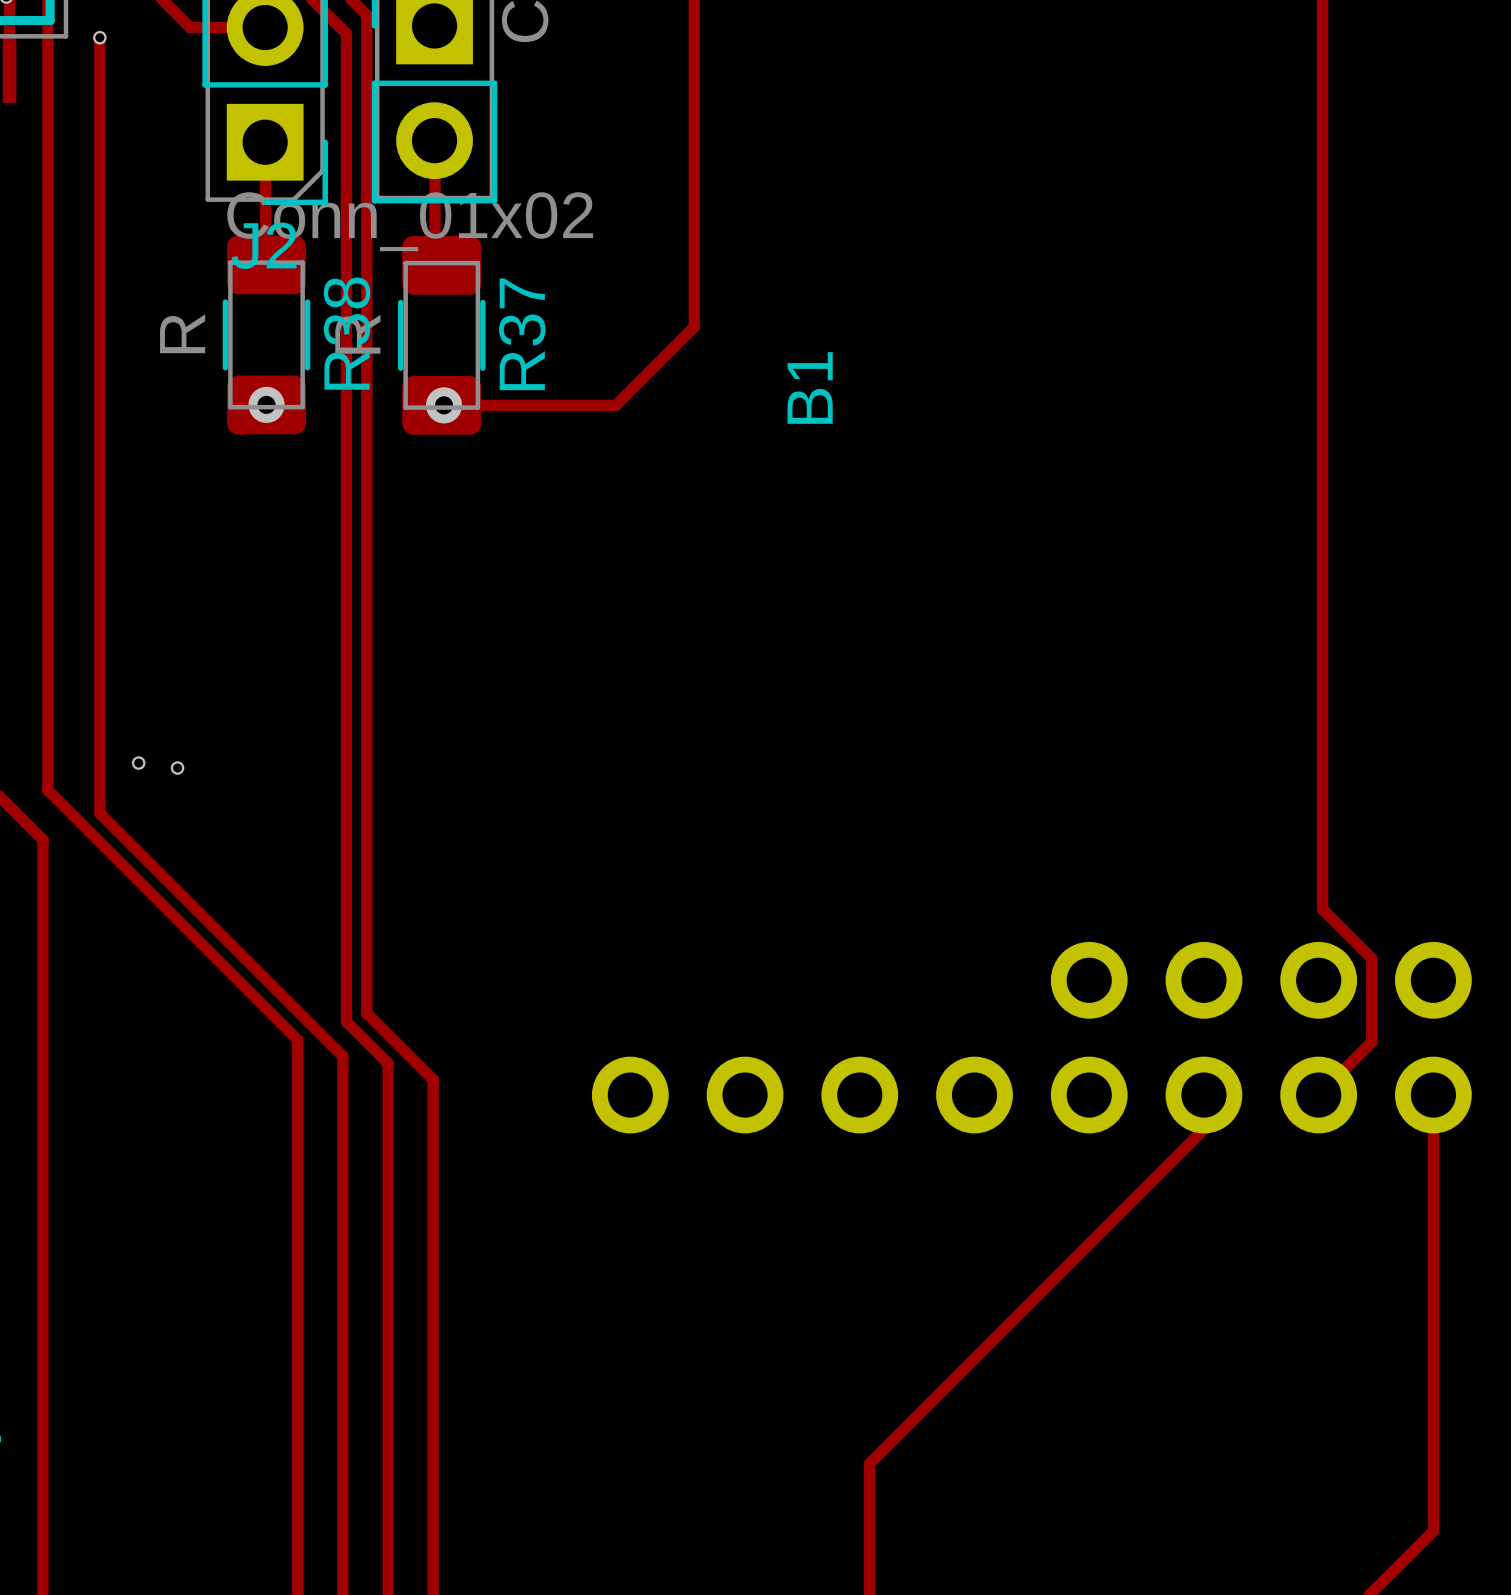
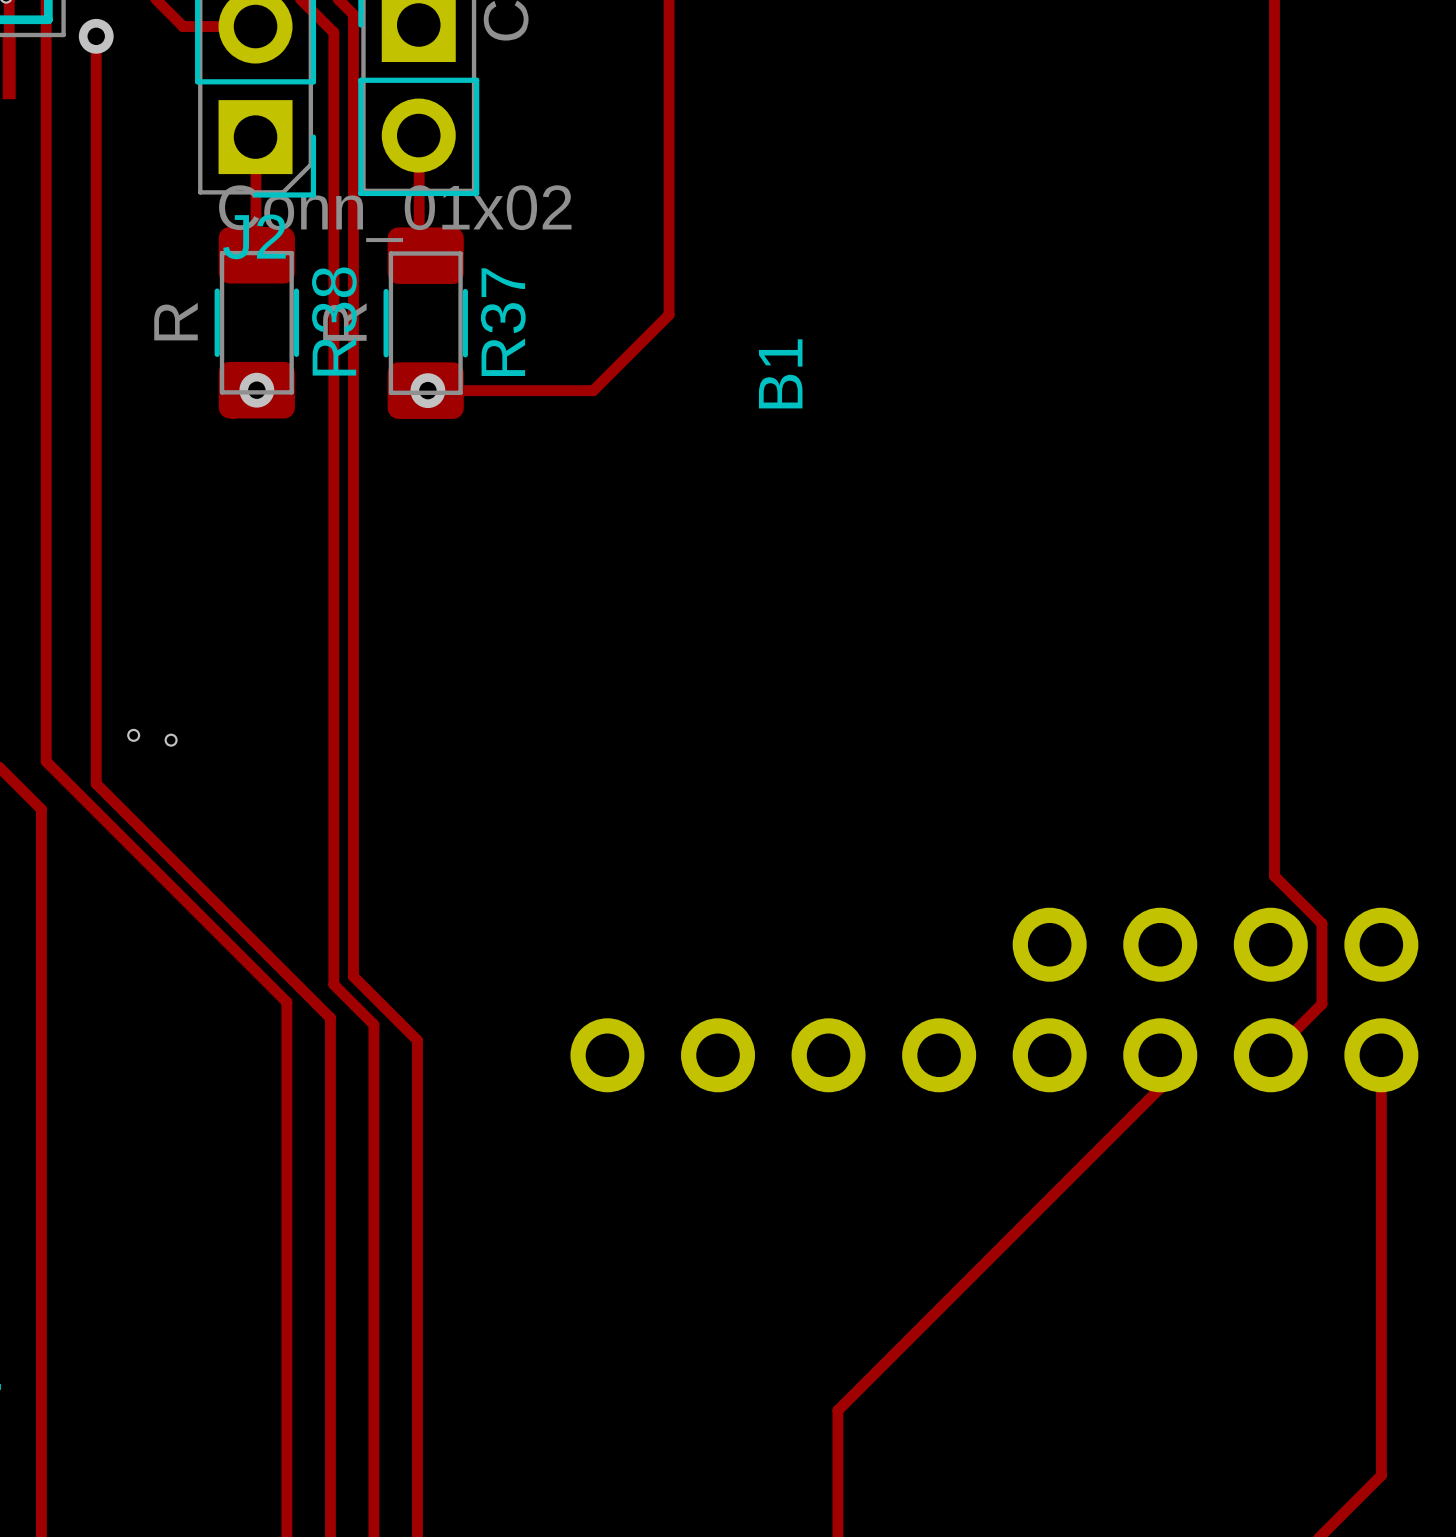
via size: [93, 30, 107, 45] -> [78, 18, 114, 54]

